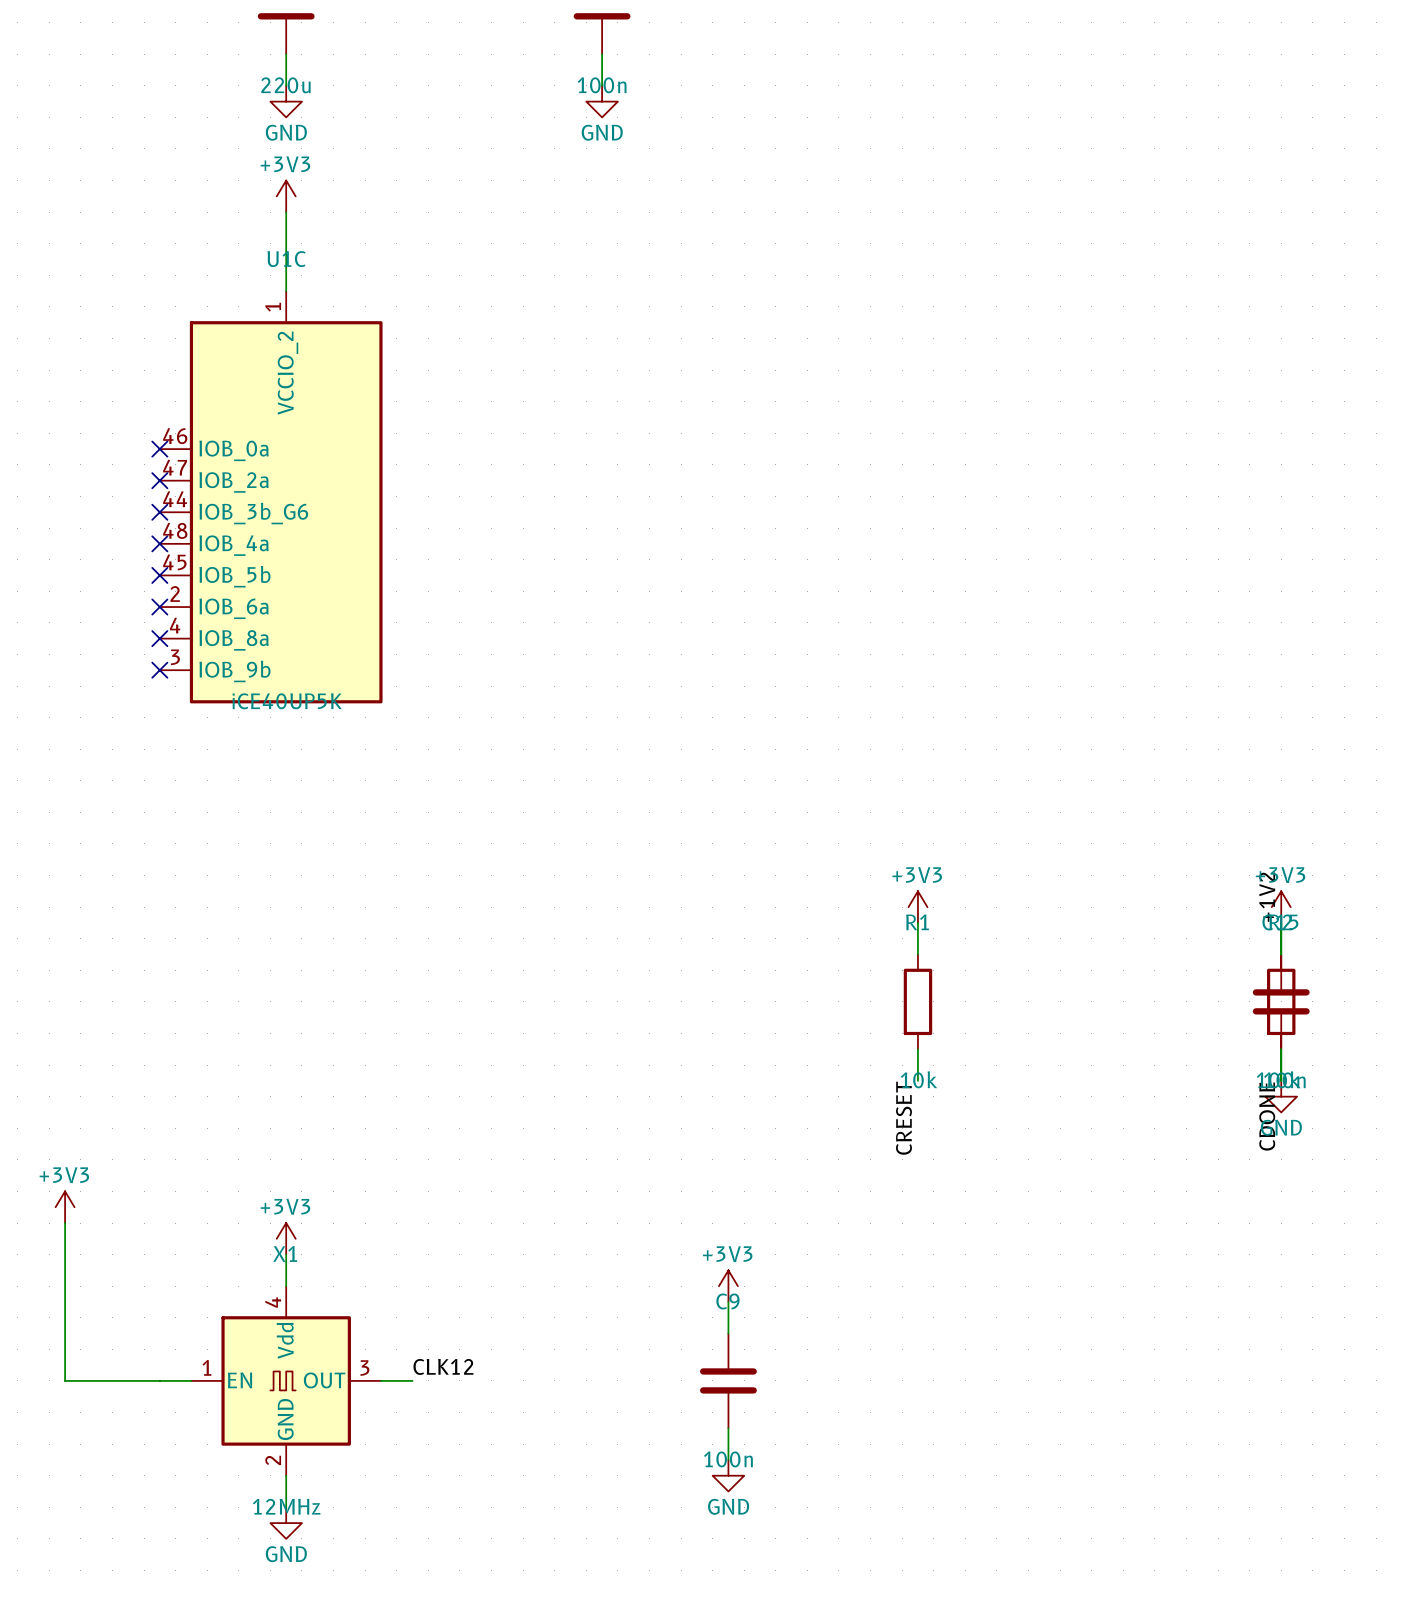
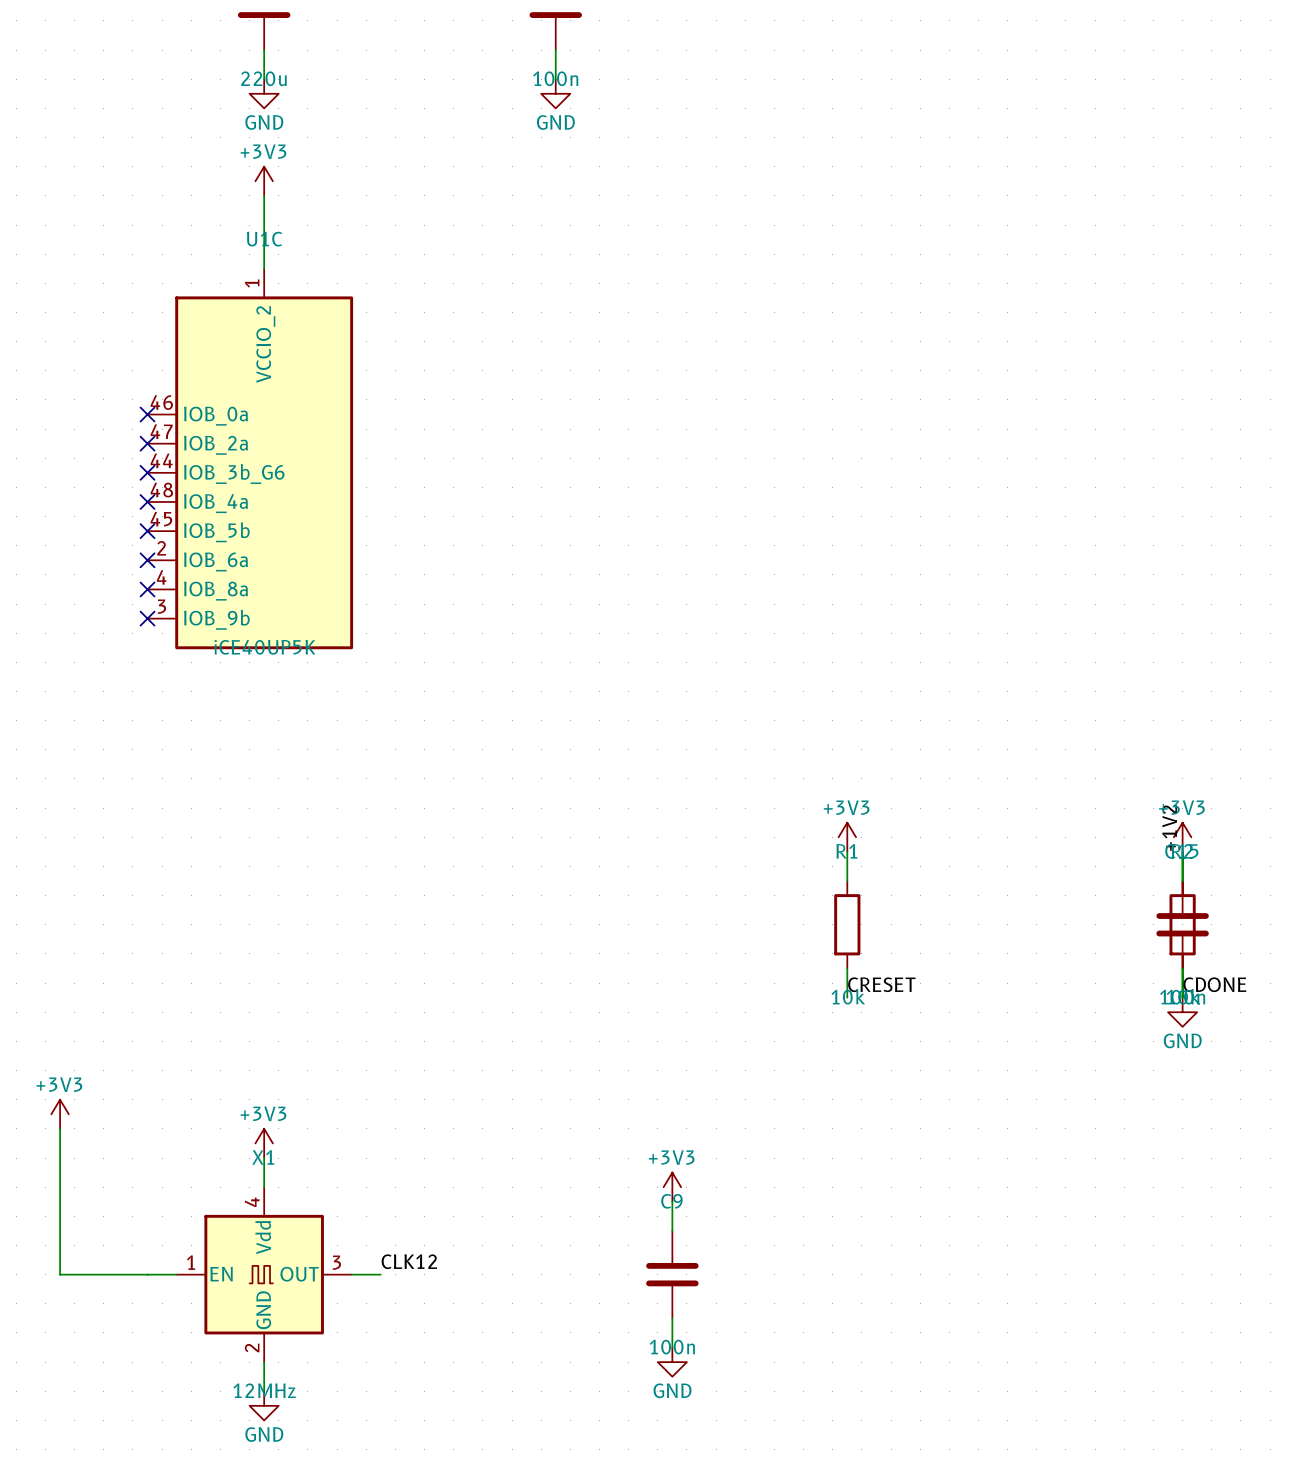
label rotation: 0° (1267, 1116) -> 90° clockwise (1214, 984)
label rotation: 0° (903, 1118) -> 90° clockwise (881, 984)

